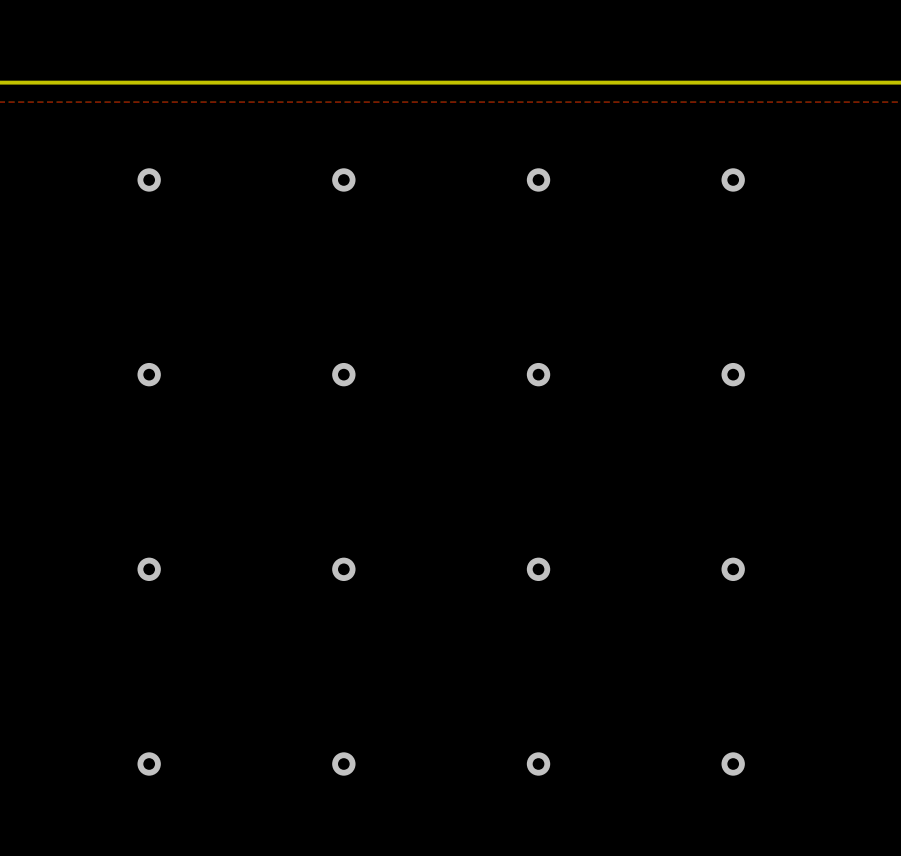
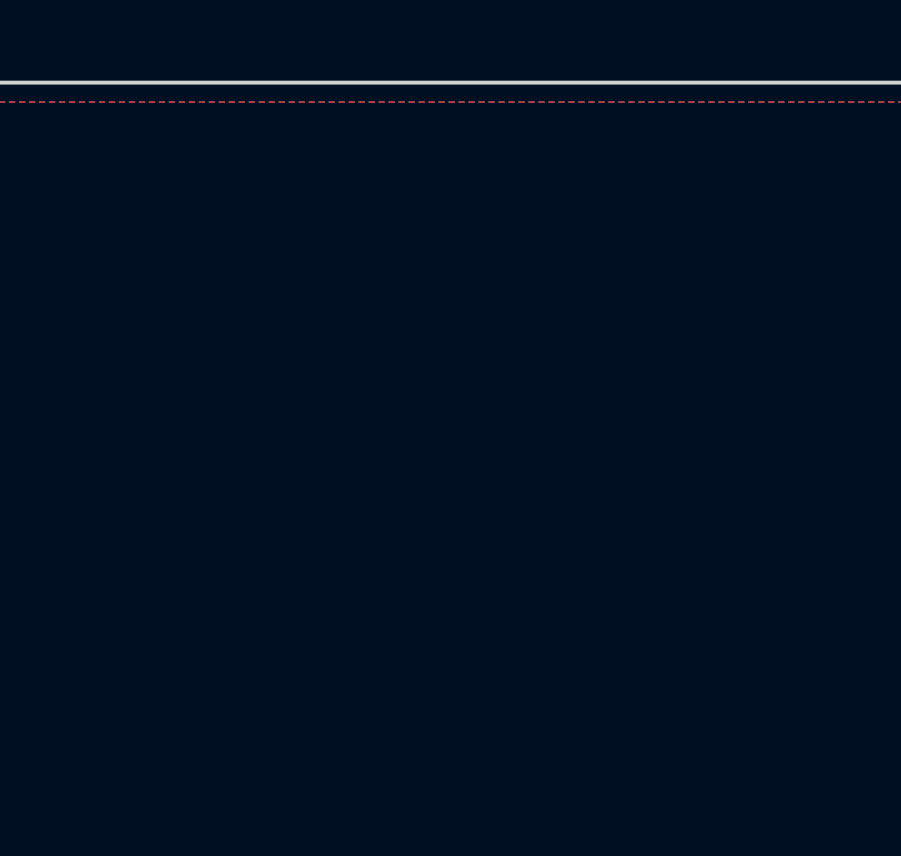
via: (149, 179) -> none
via: (343, 179) -> none
via: (538, 179) -> none
via: (733, 179) -> none
via: (149, 374) -> none
via: (343, 374) -> none
via: (538, 374) -> none
via: (733, 374) -> none
via: (149, 569) -> none
via: (343, 569) -> none
via: (538, 569) -> none
via: (733, 569) -> none
via: (149, 764) -> none
via: (343, 764) -> none
via: (538, 764) -> none
via: (733, 764) -> none

